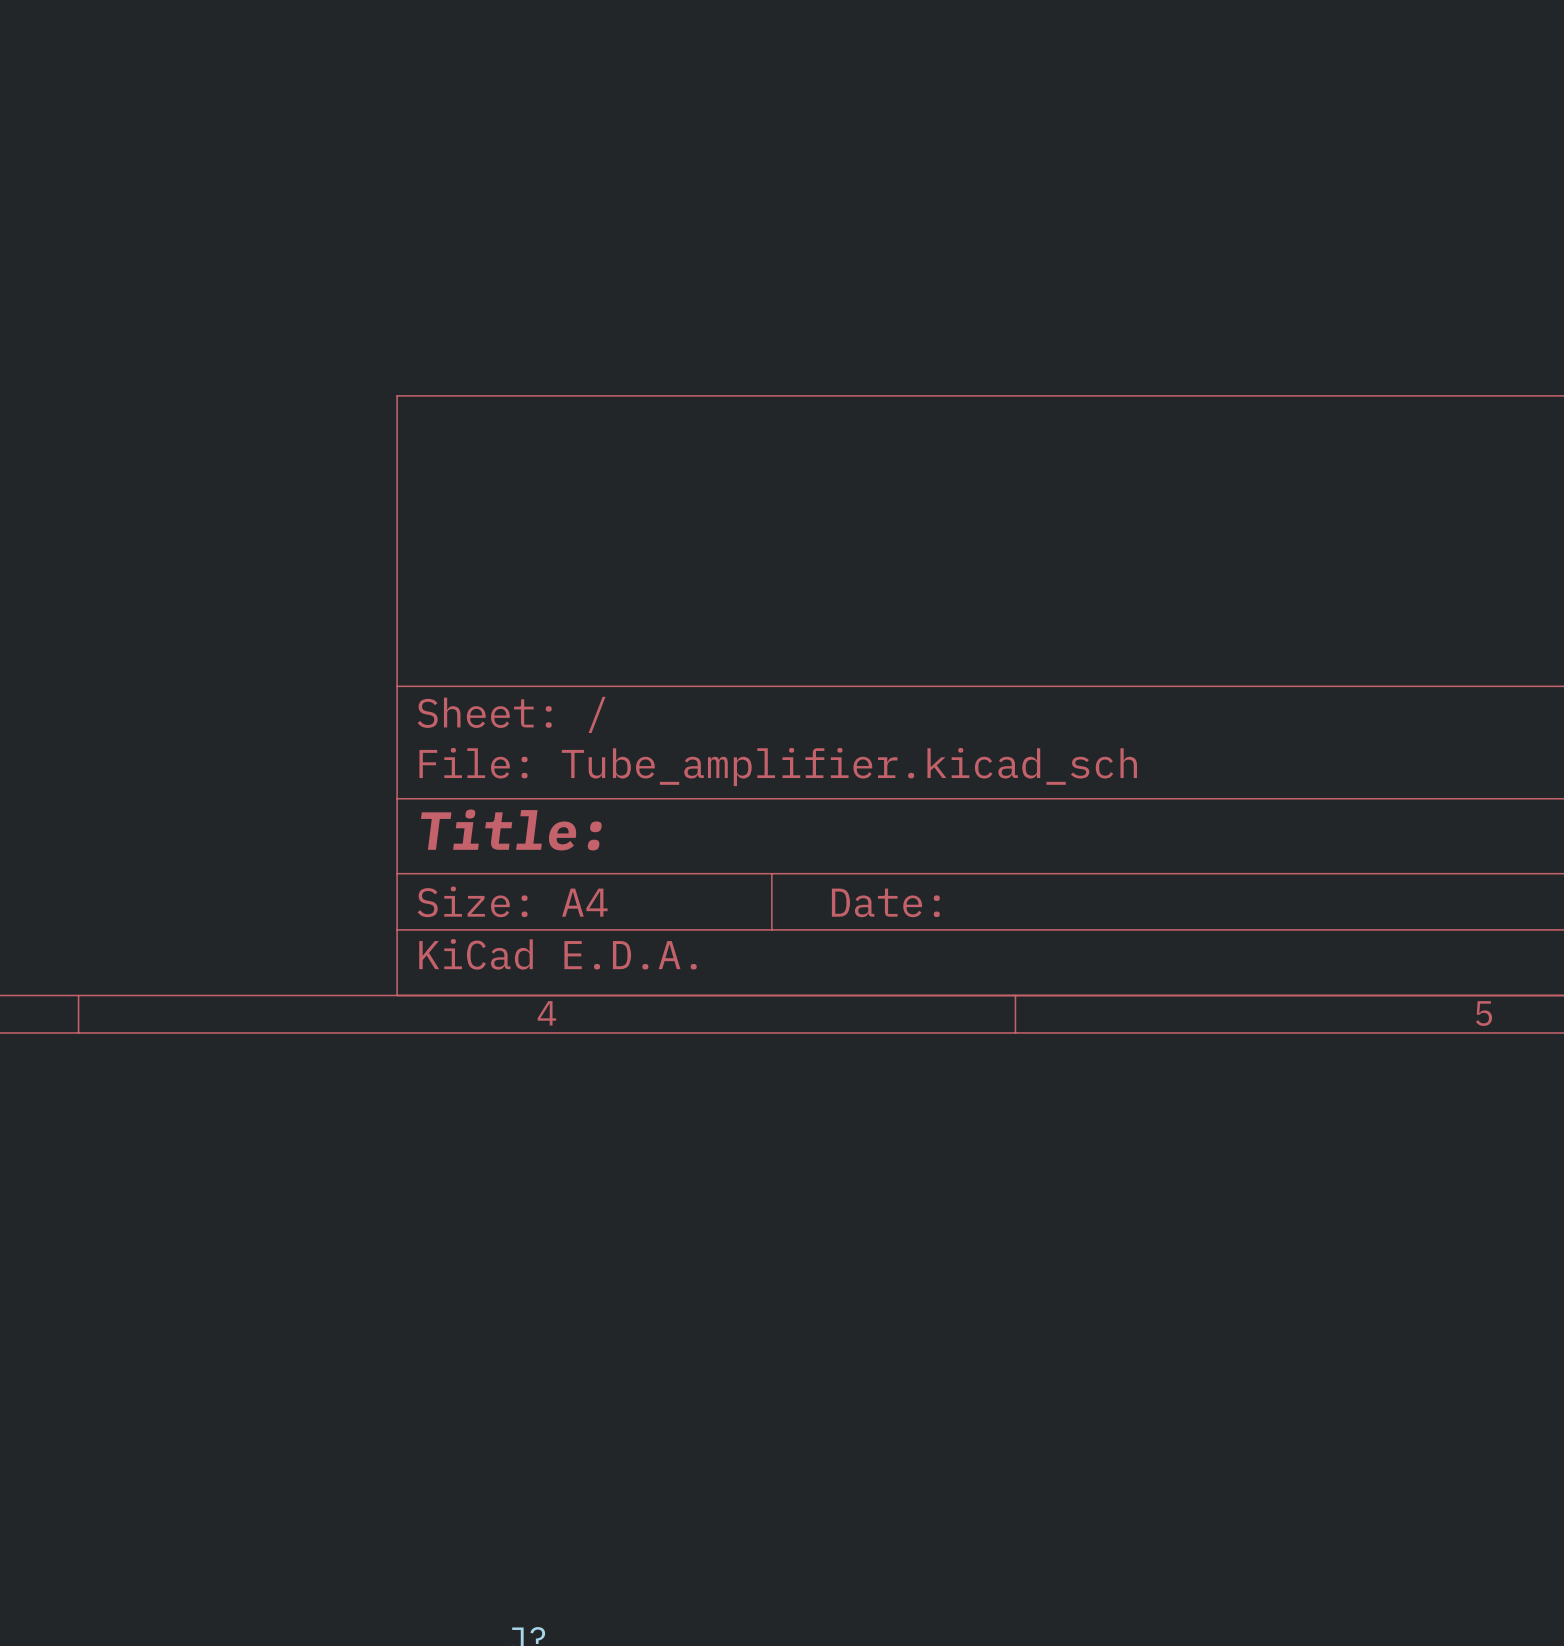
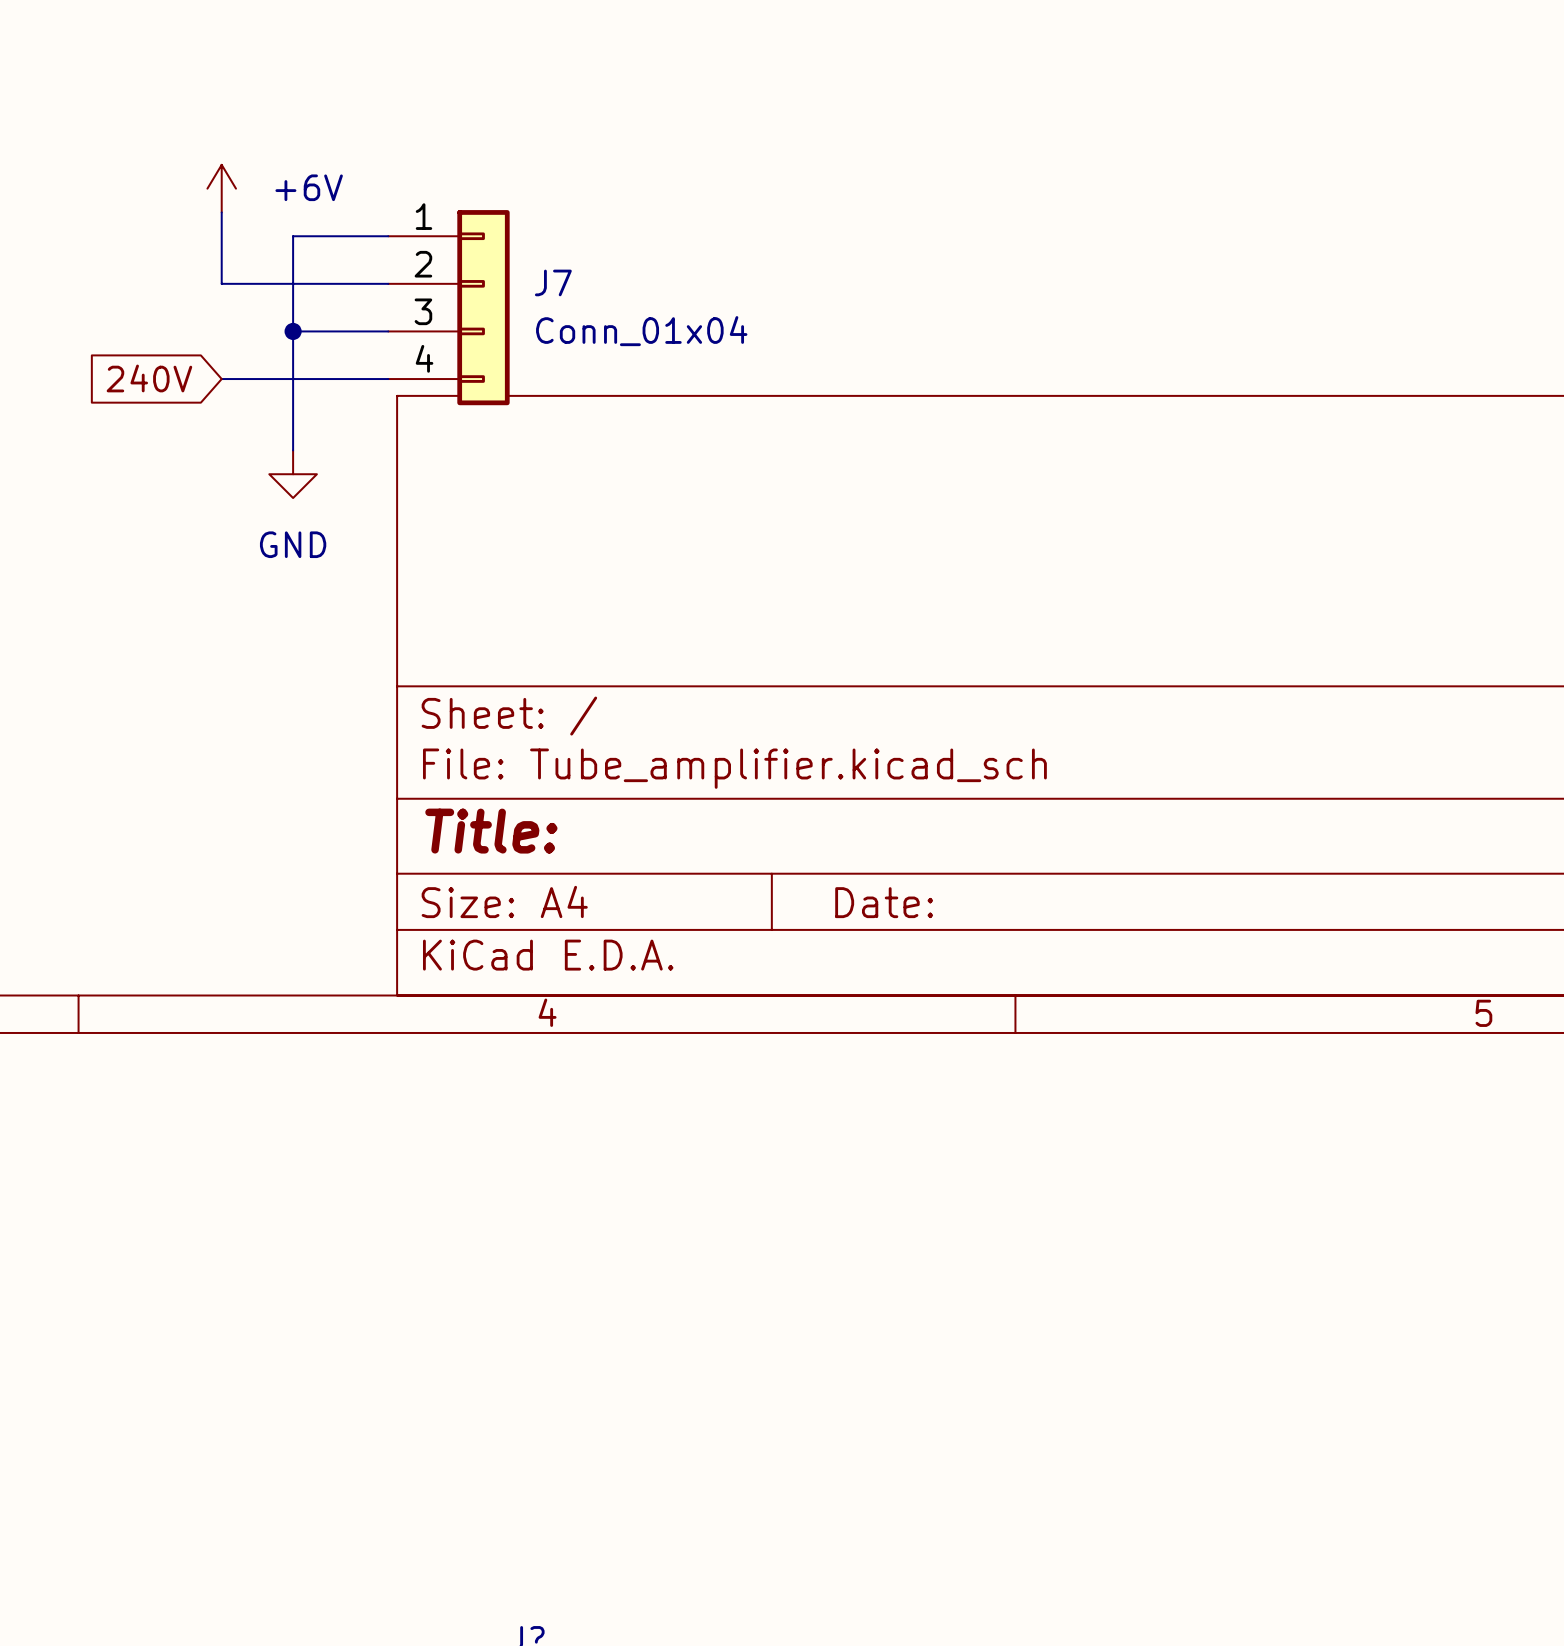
power symbol: none -> +6V (221, 188)
wire: none -> (221, 212) (221, 283) (388, 283)
wire: none -> (388, 236) (293, 236) (293, 450)
J7: none -> Conn_01x04 (448, 307)
wire: none -> (293, 331) (388, 331)
junction: none -> (293, 331)
global label: none -> 240V (149, 378)
wire: none -> (221, 379) (388, 379)
power symbol: none -> GND (293, 474)

